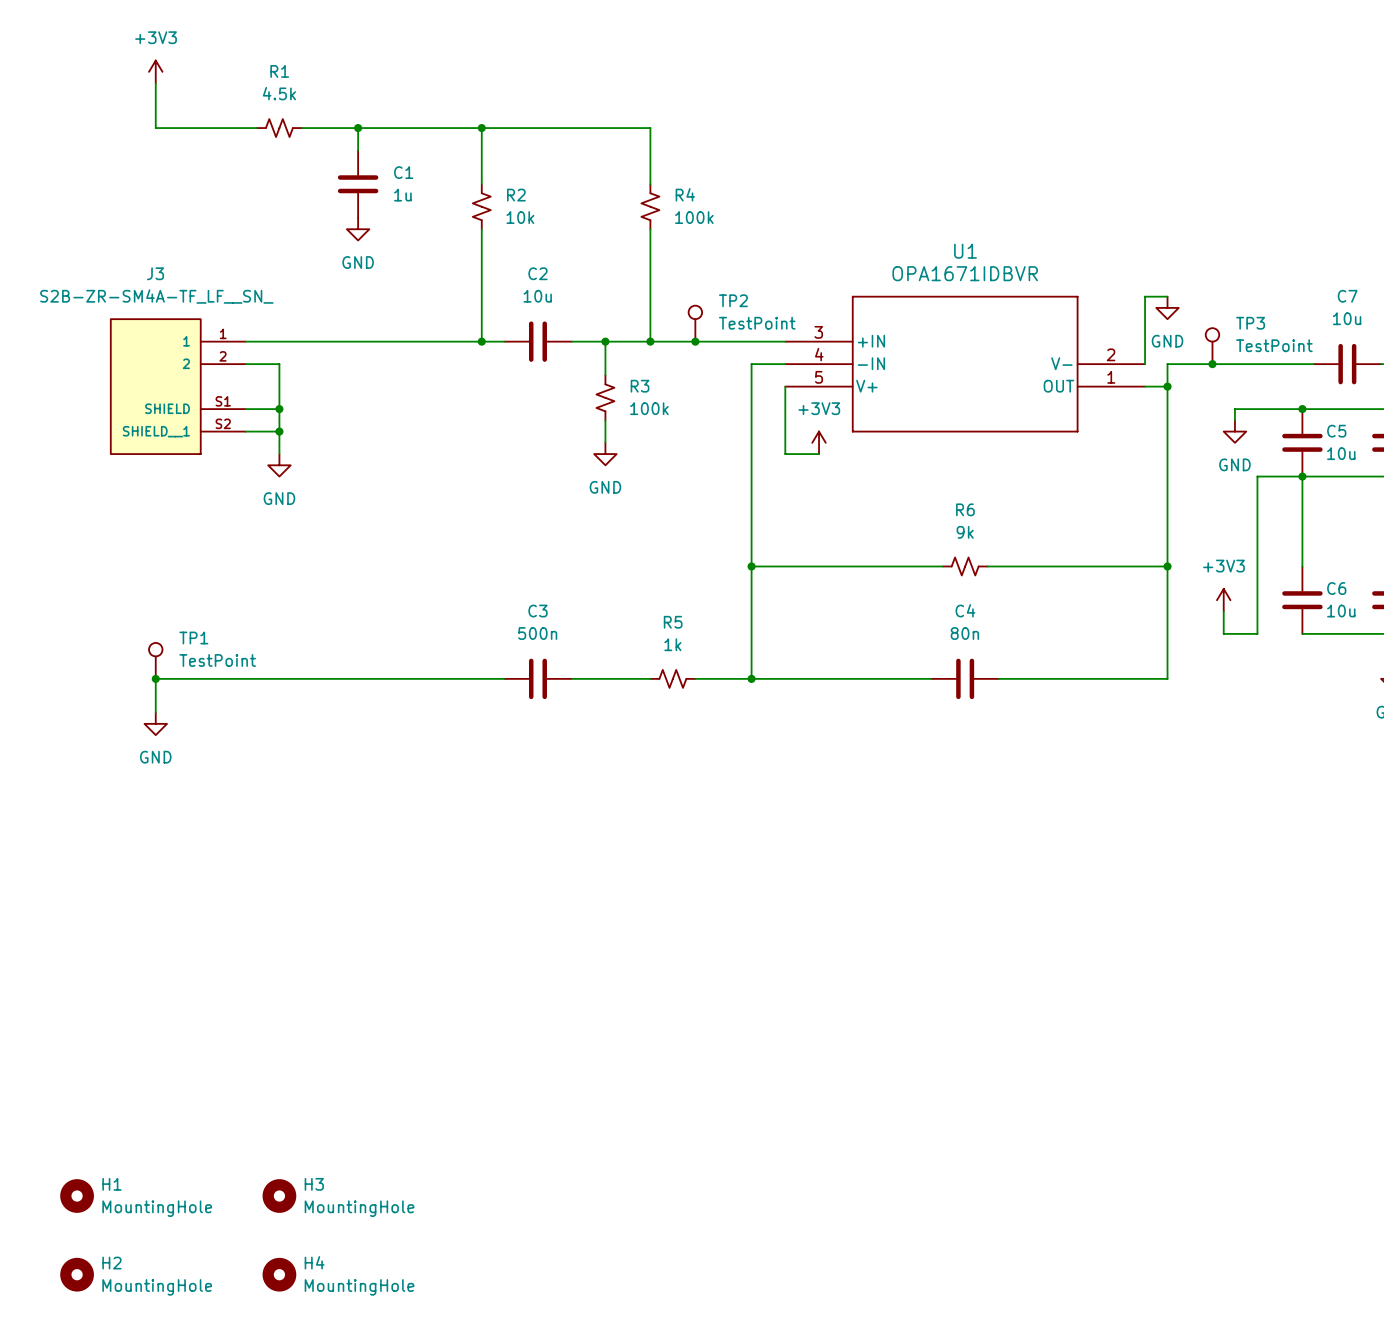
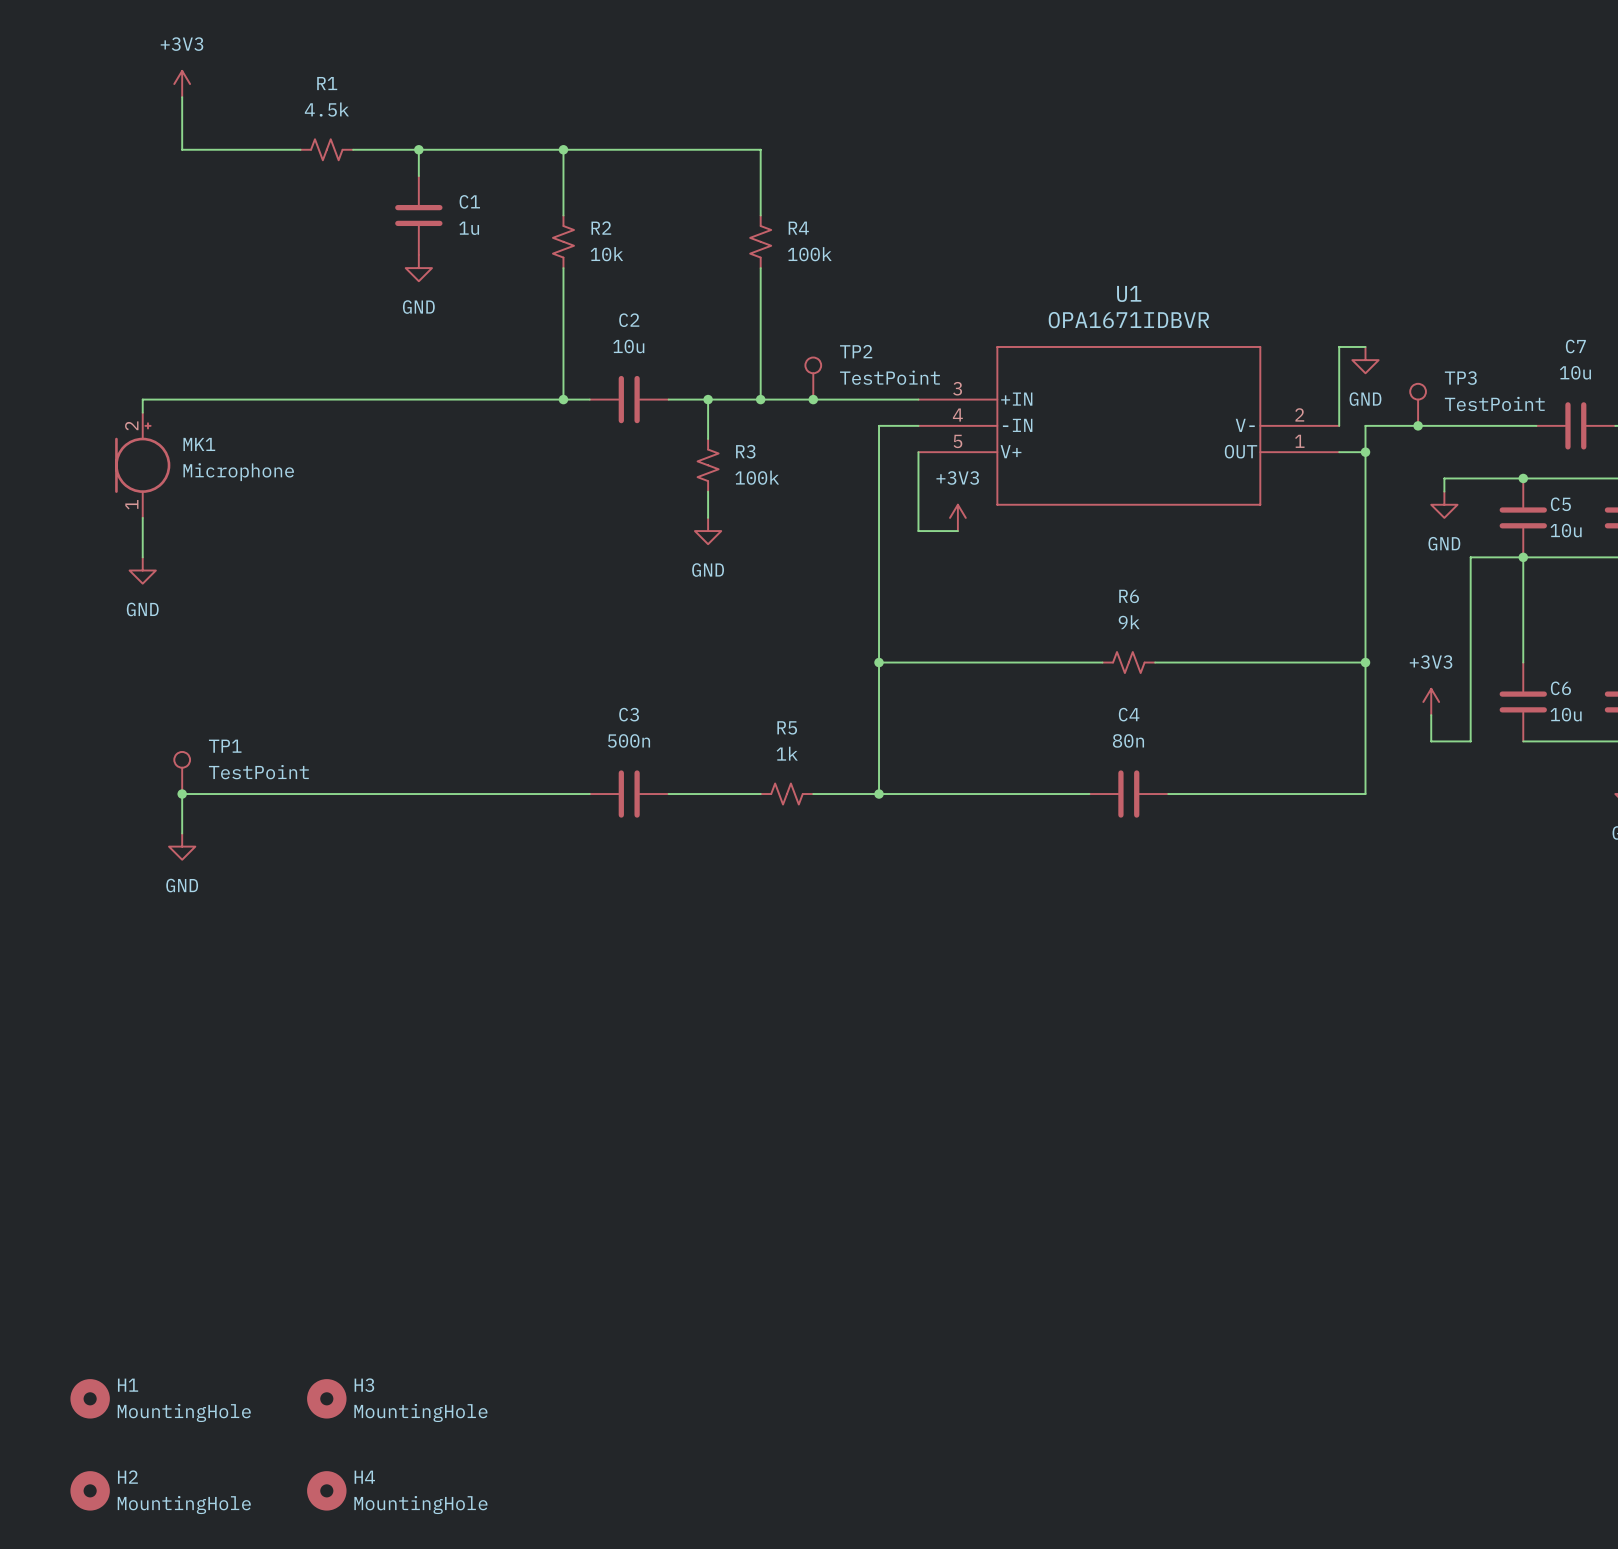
wire: (245, 364) (279, 364) (279, 454) -> none
J3: S2B-ZR-SM4A-TF_LF__SN_ (177, 386) -> none
MK1: none -> Microphone (142, 465)
wire: (245, 409) (279, 409) -> none
junction: (279, 409) -> none
wire: (245, 431) (279, 431) -> none
junction: (279, 431) -> none
wire: none -> (142, 517) (142, 557)
power symbol position: GND (279, 465) -> GND (142, 570)

